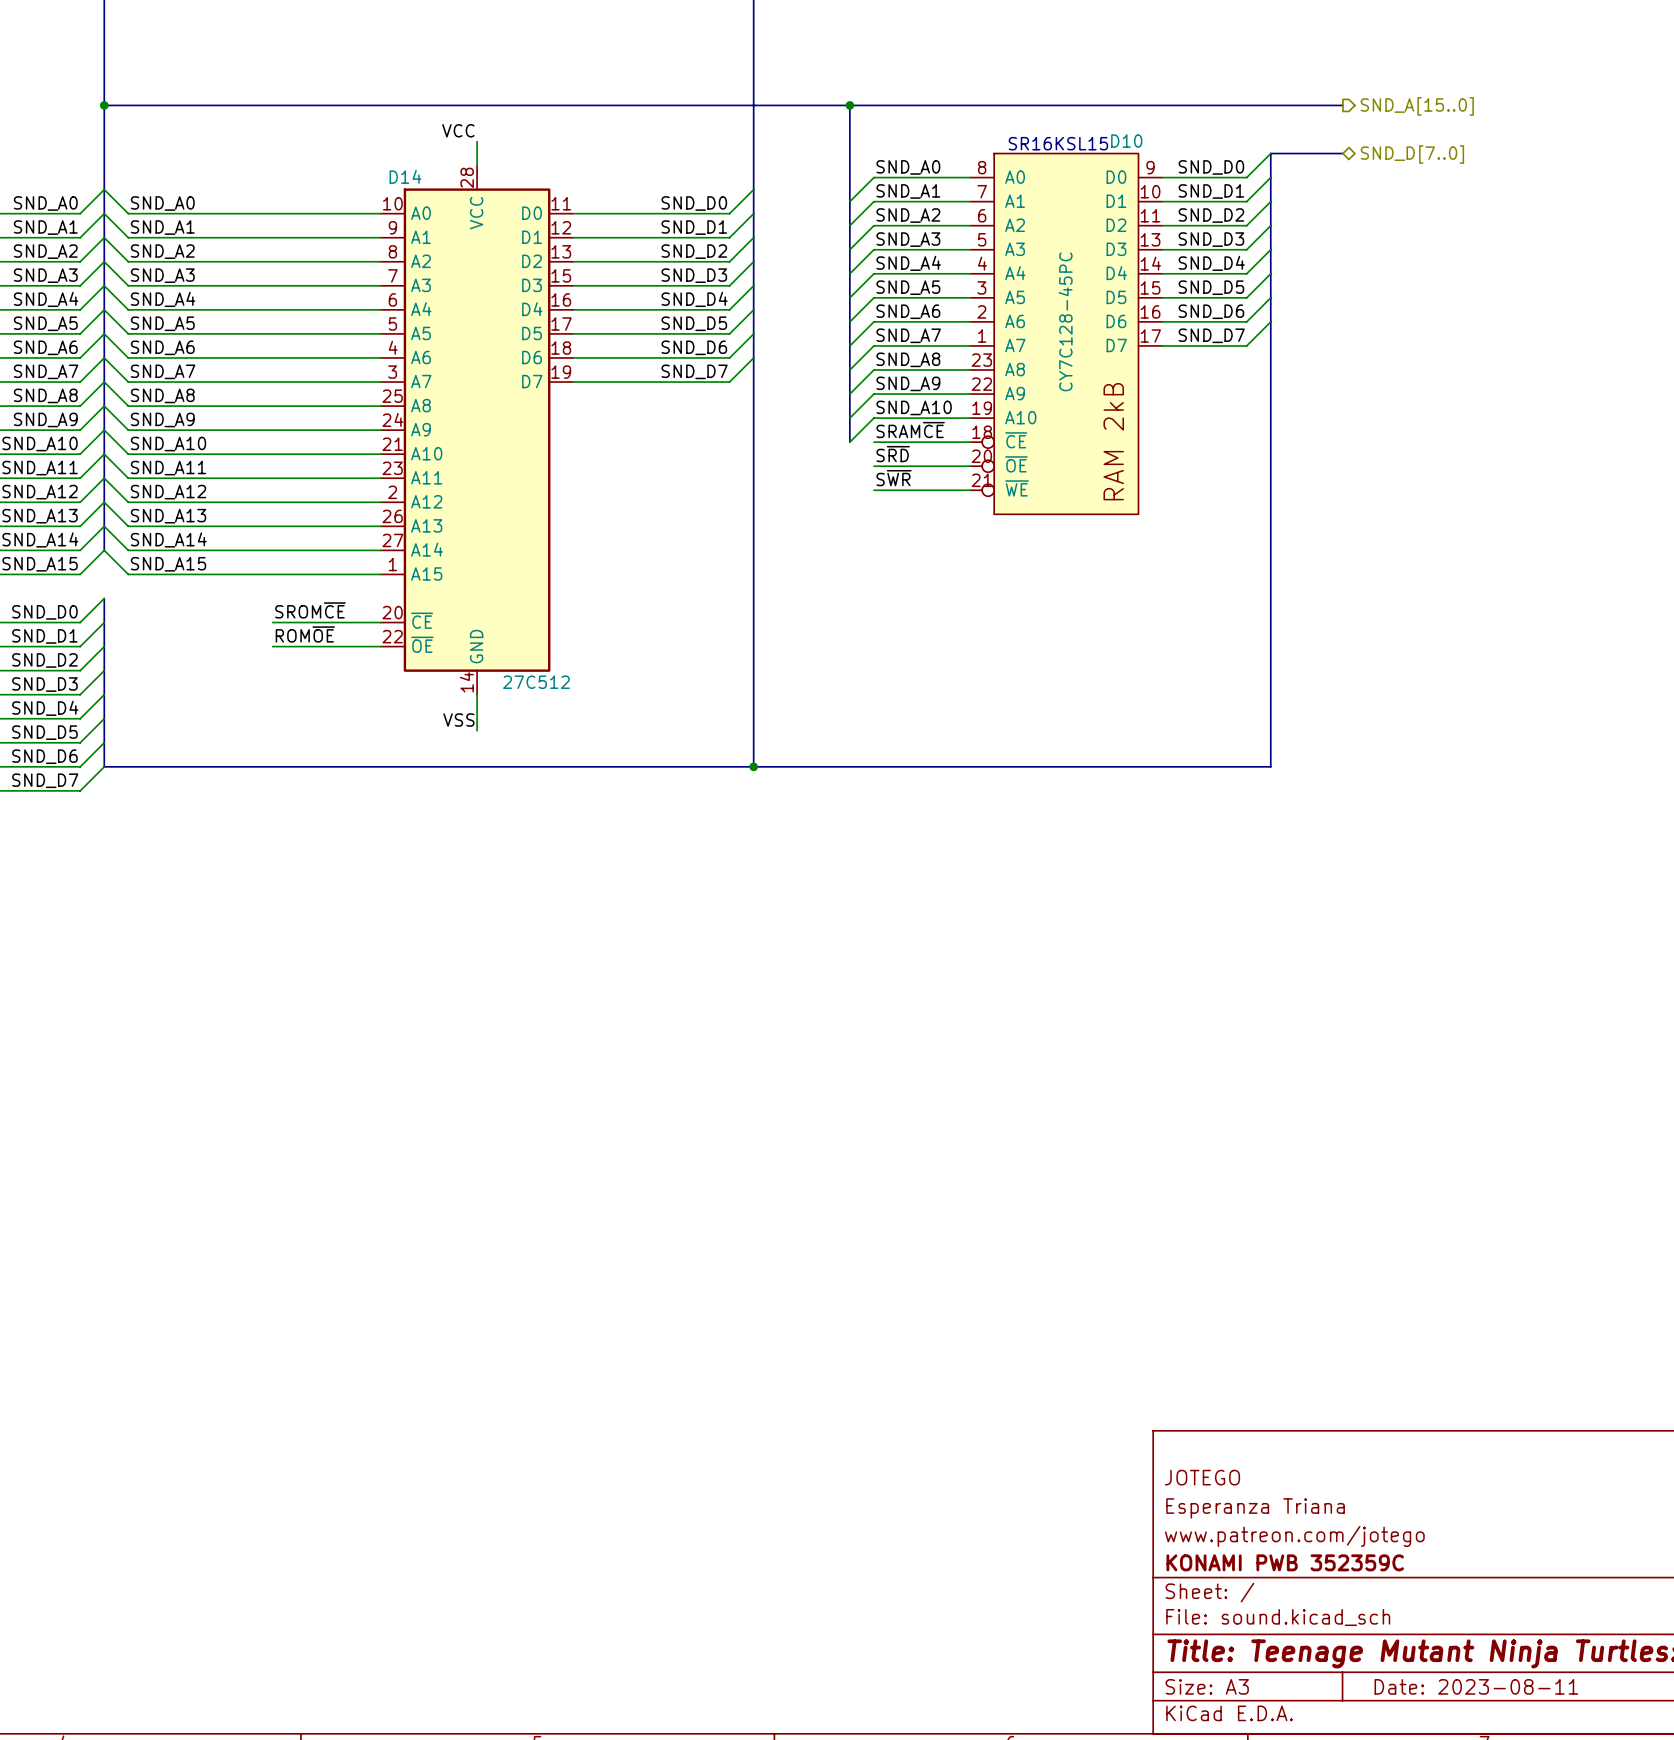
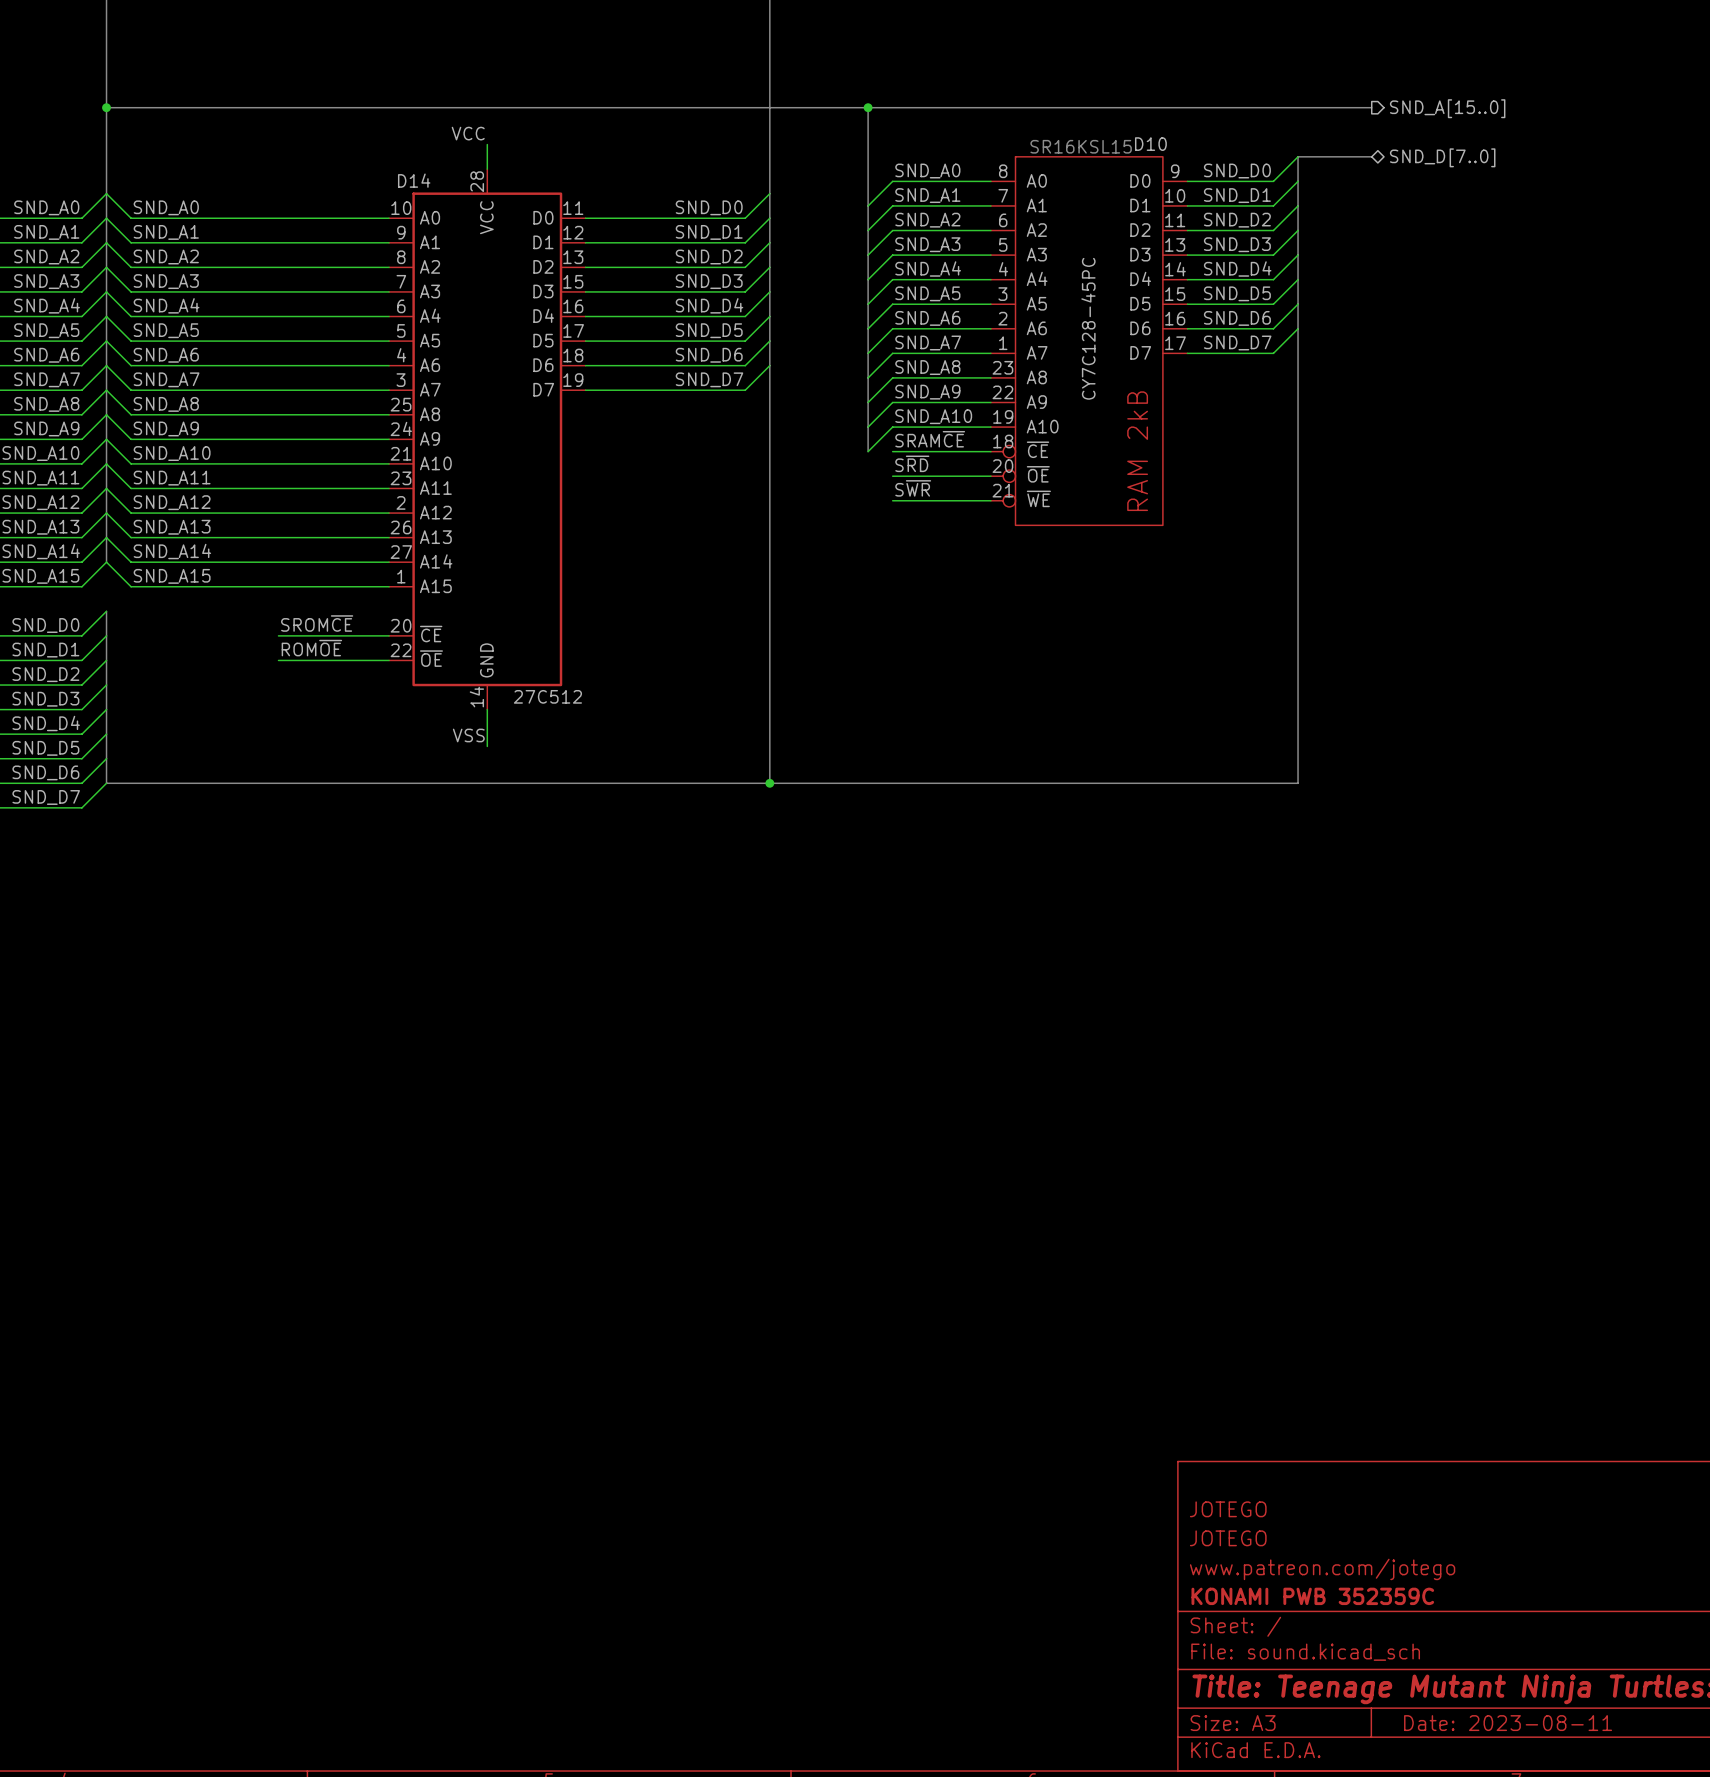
title block: Esperanza Triana (1255, 1508) -> JOTEGO (1228, 1538)

